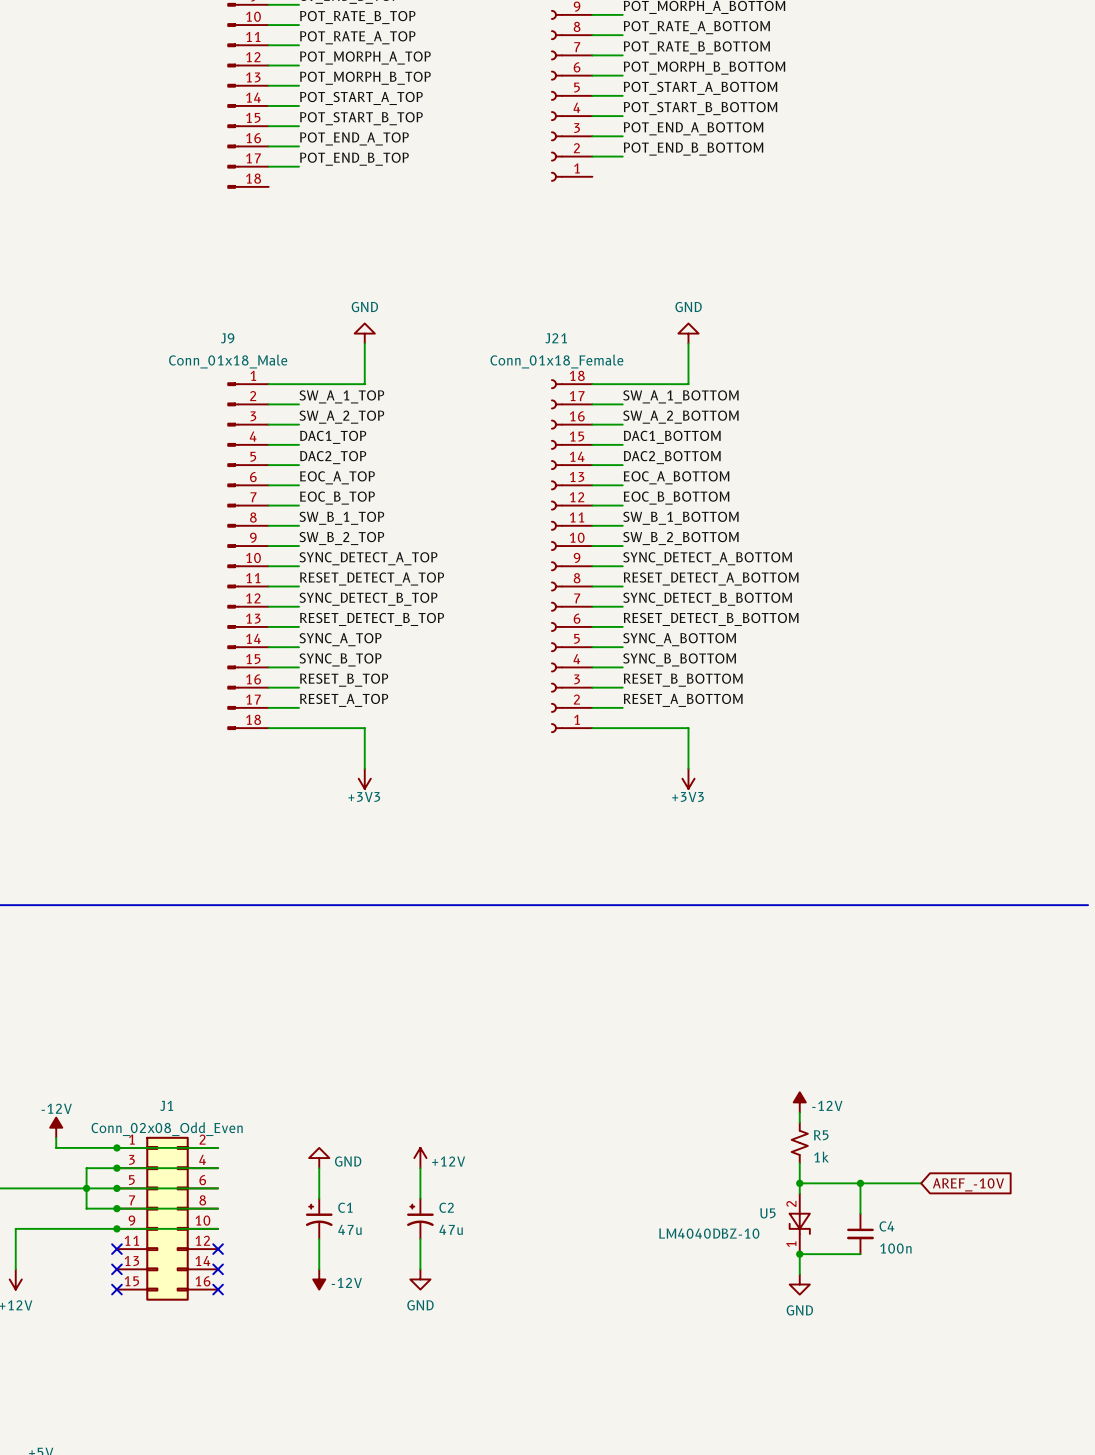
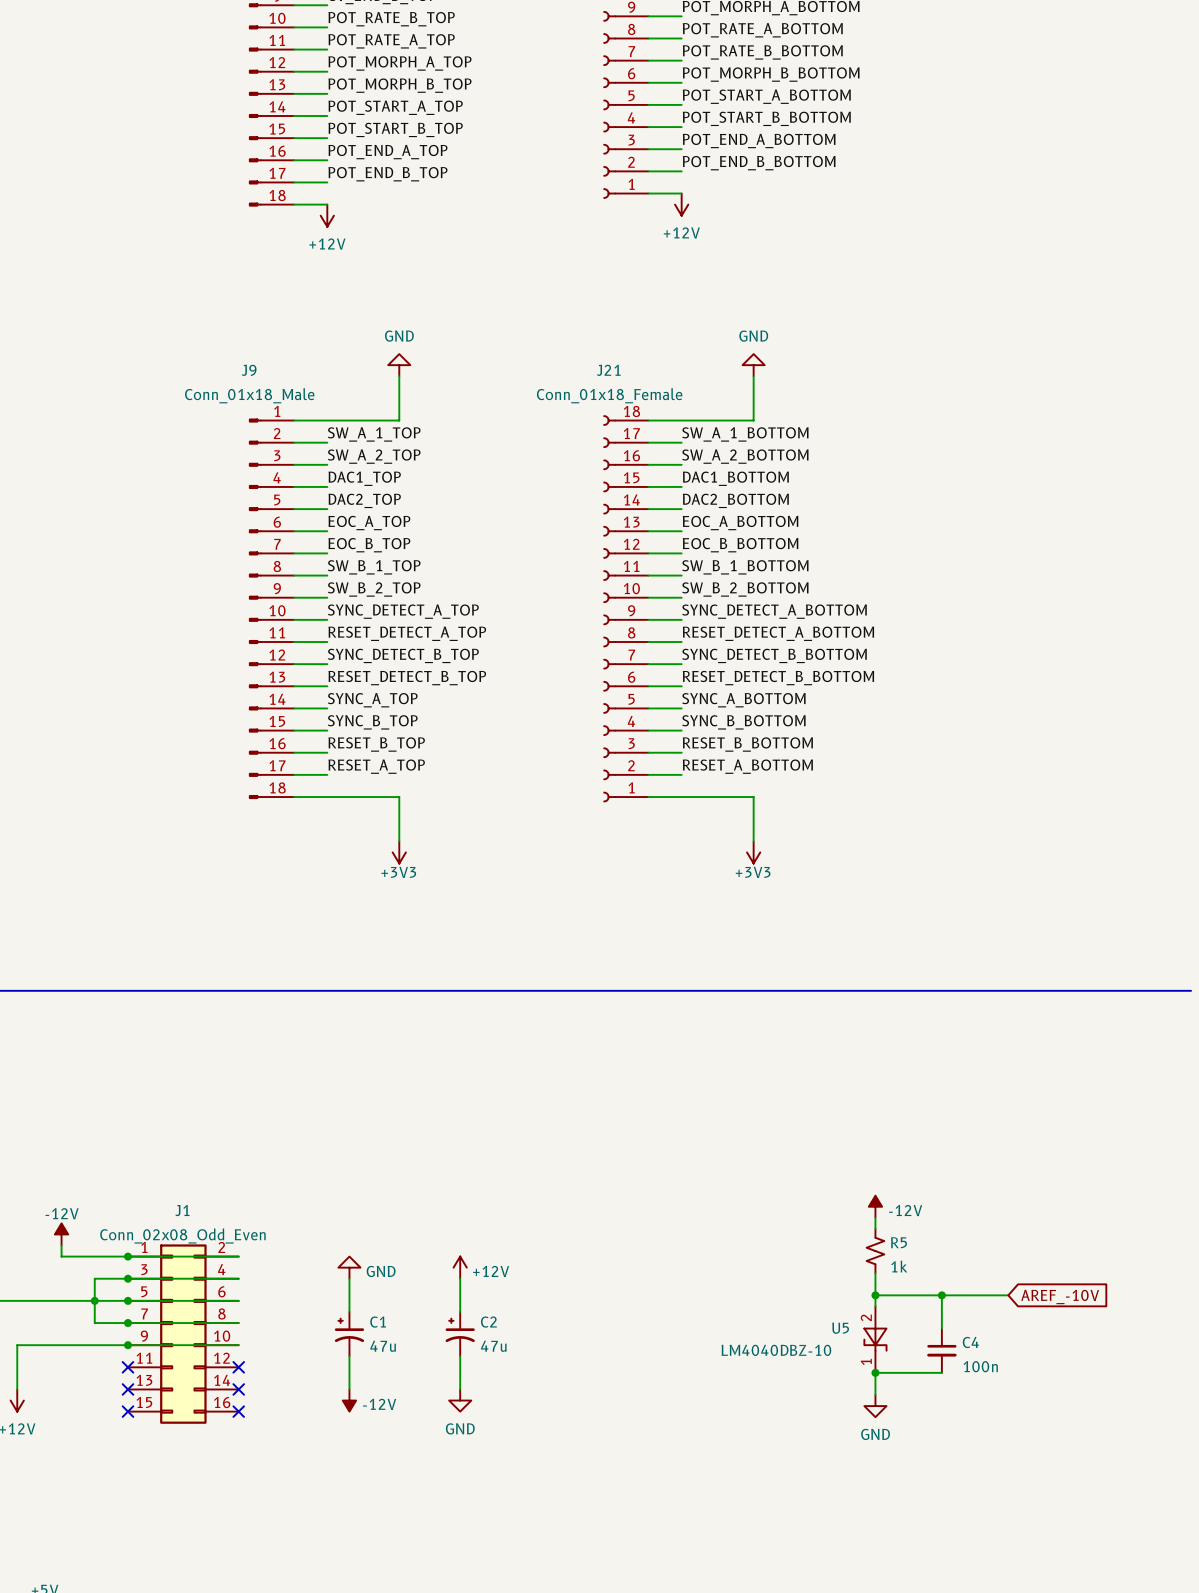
wire: none -> (648, 193) (681, 193)
wire: none -> (294, 204) (327, 204)
power symbol: none -> +12V (681, 204)
power symbol: none -> +12V (327, 215)

